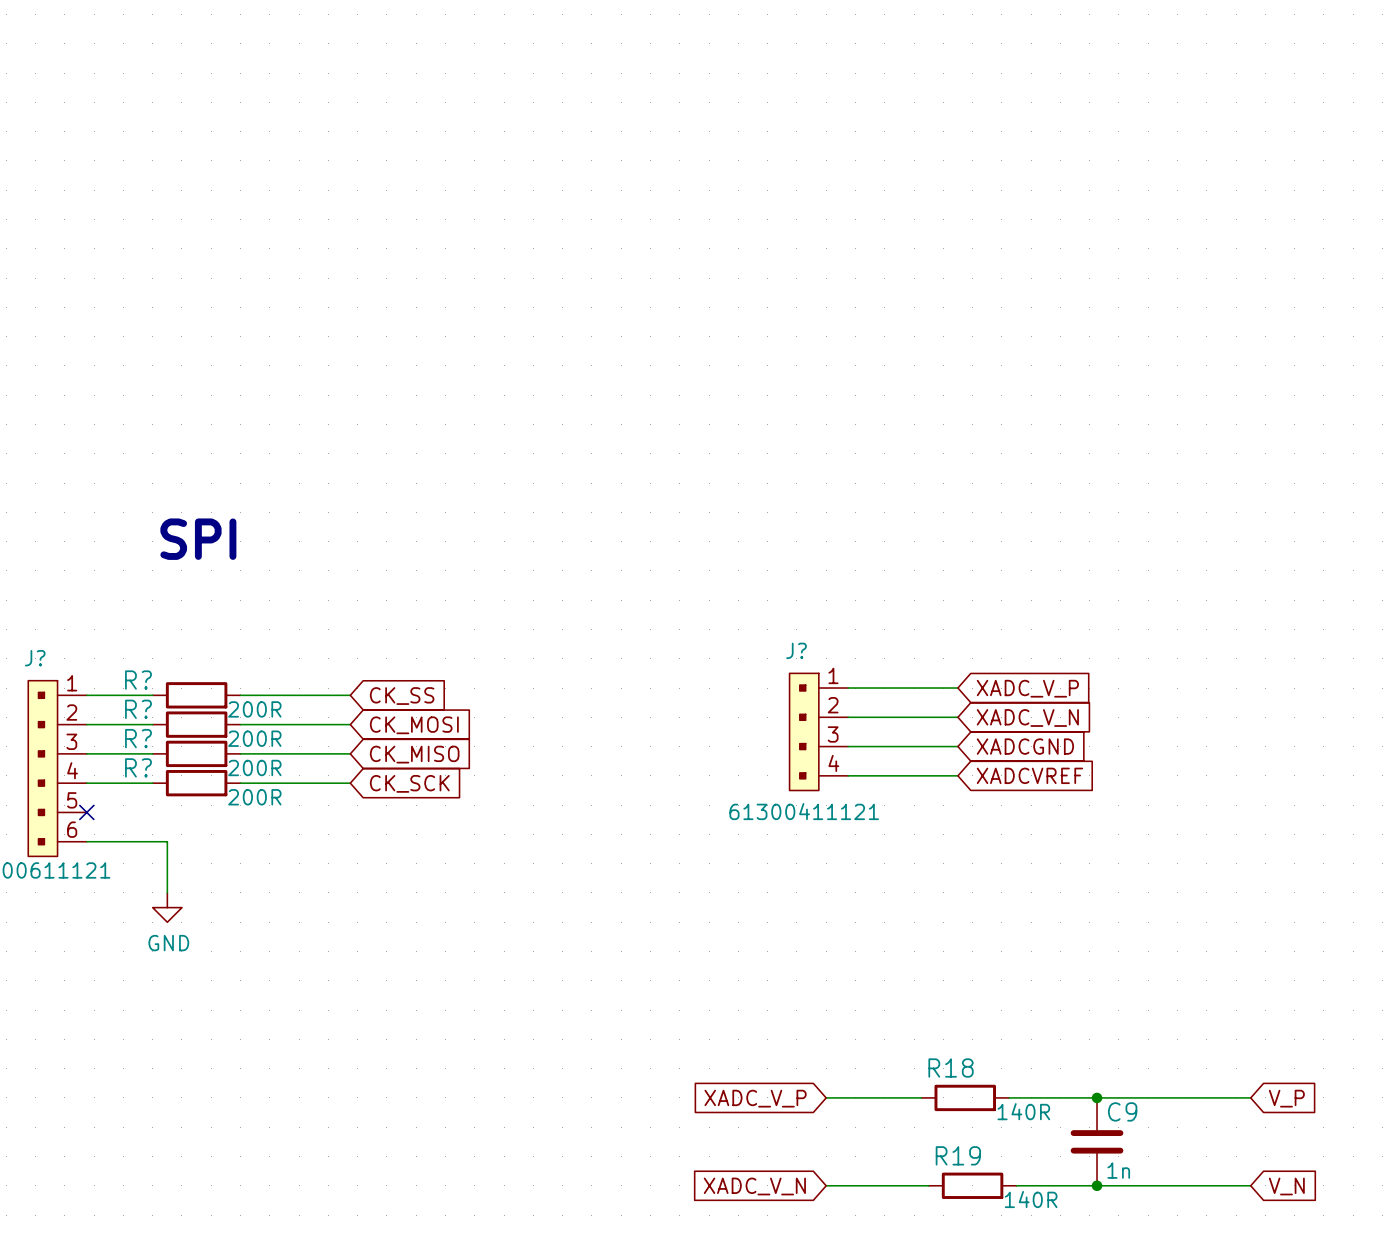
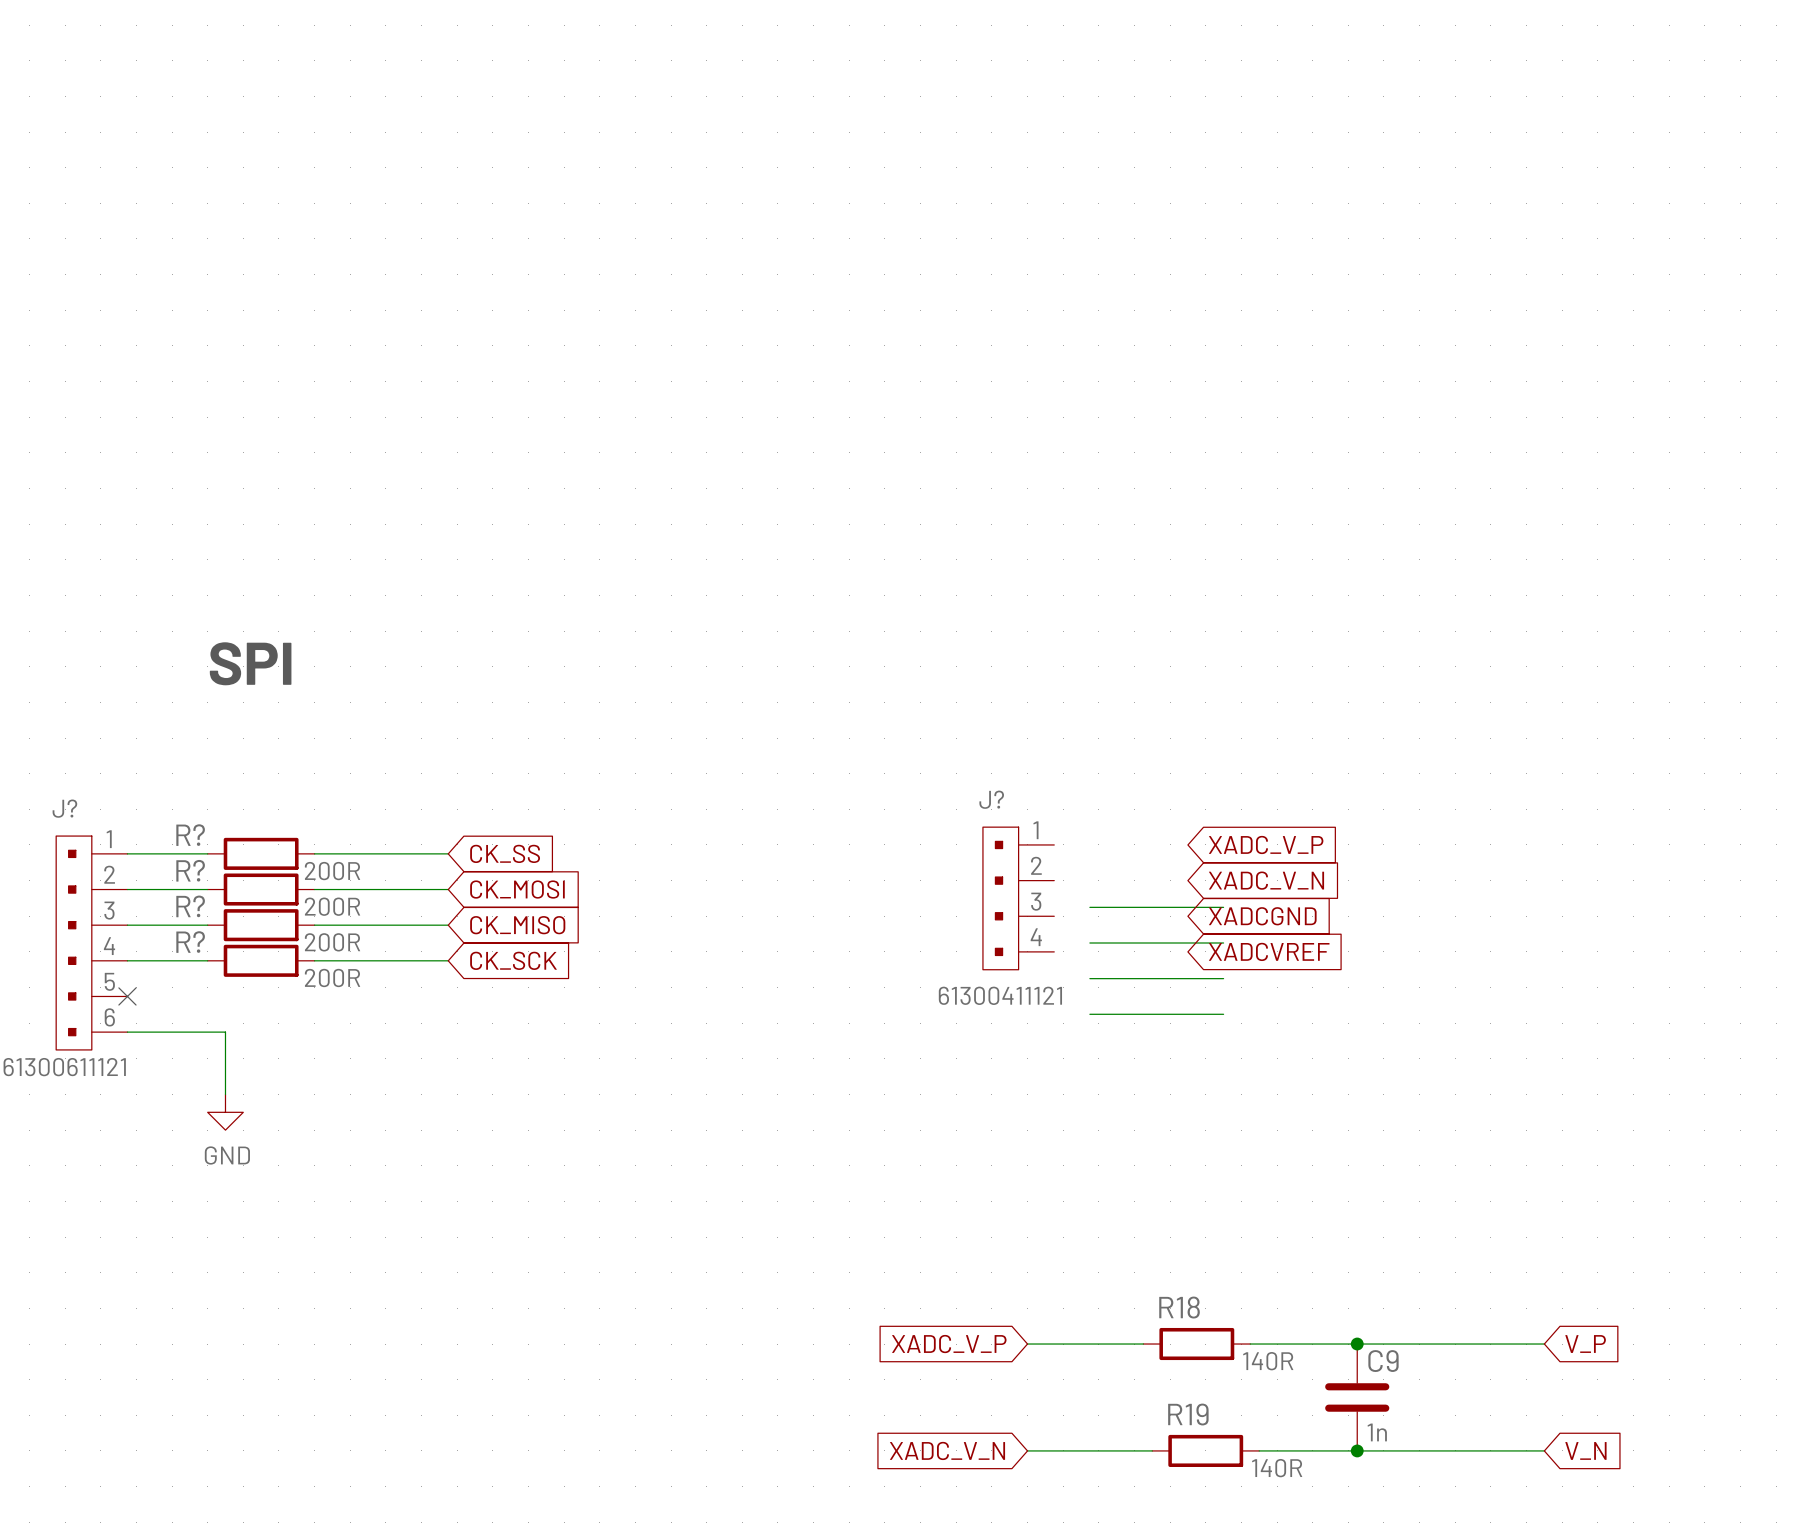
wire: (848, 688) (957, 688) -> (1089, 907) (1223, 907)
wire: (848, 717) (957, 717) -> (1089, 942) (1223, 942)
wire: (848, 746) (957, 746) -> (1089, 978) (1223, 978)
wire: (848, 775) (957, 775) -> (1089, 1014) (1223, 1014)

